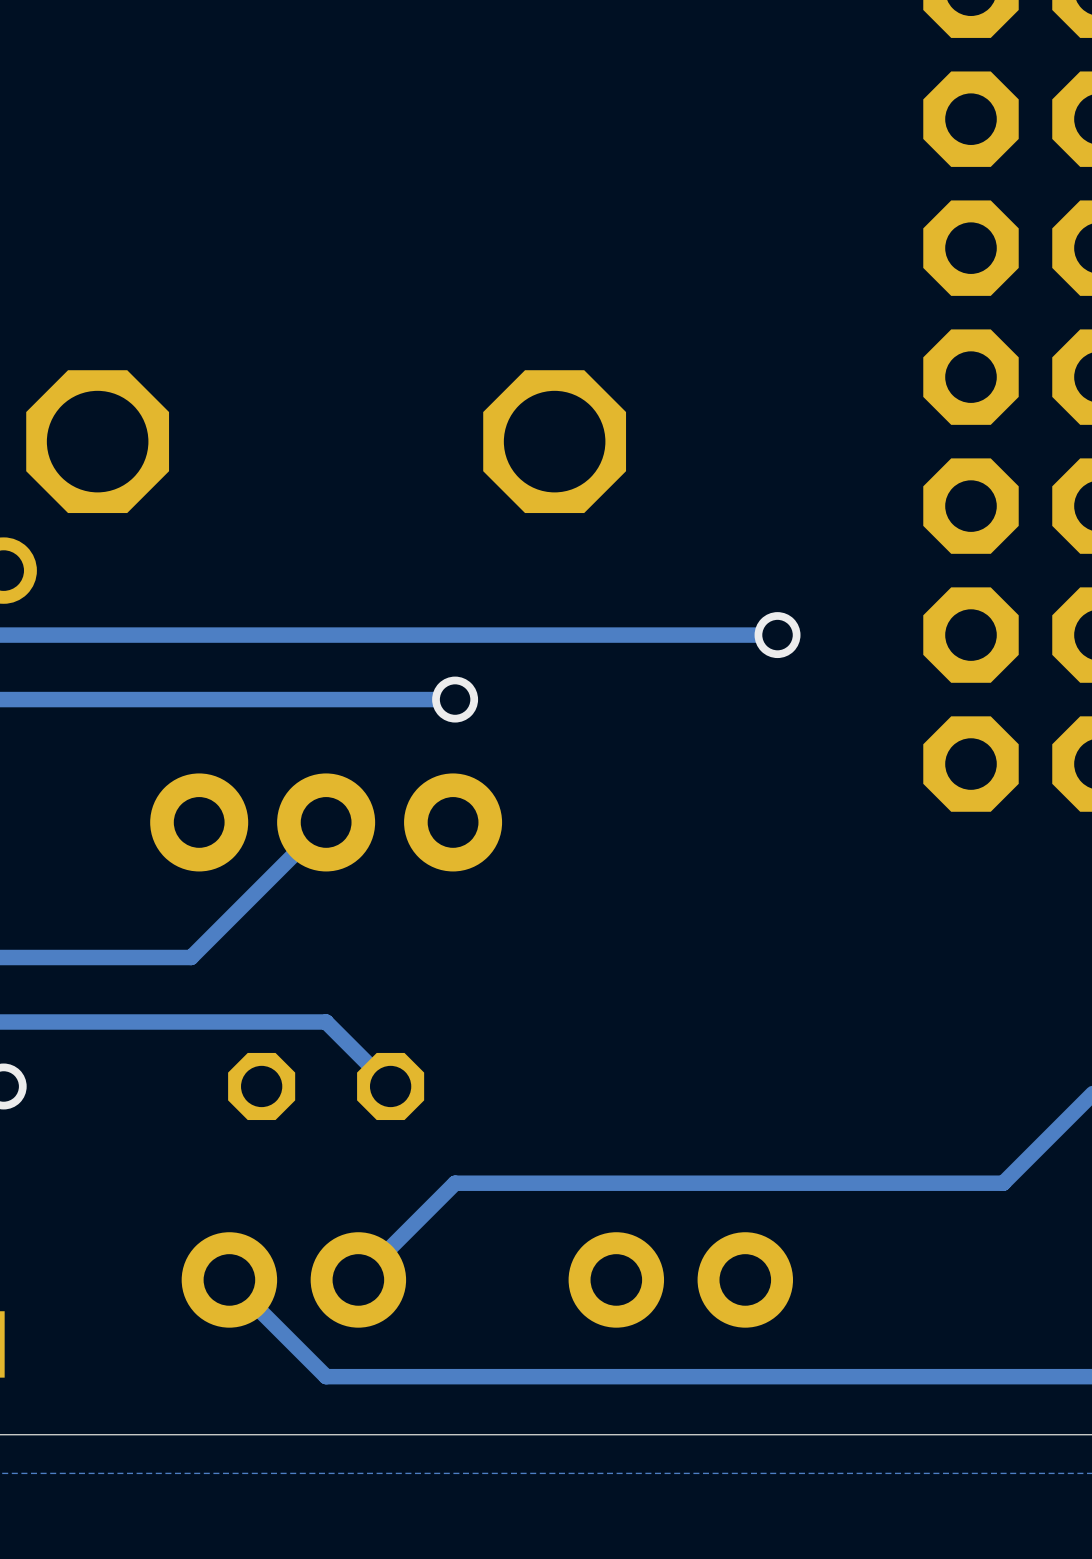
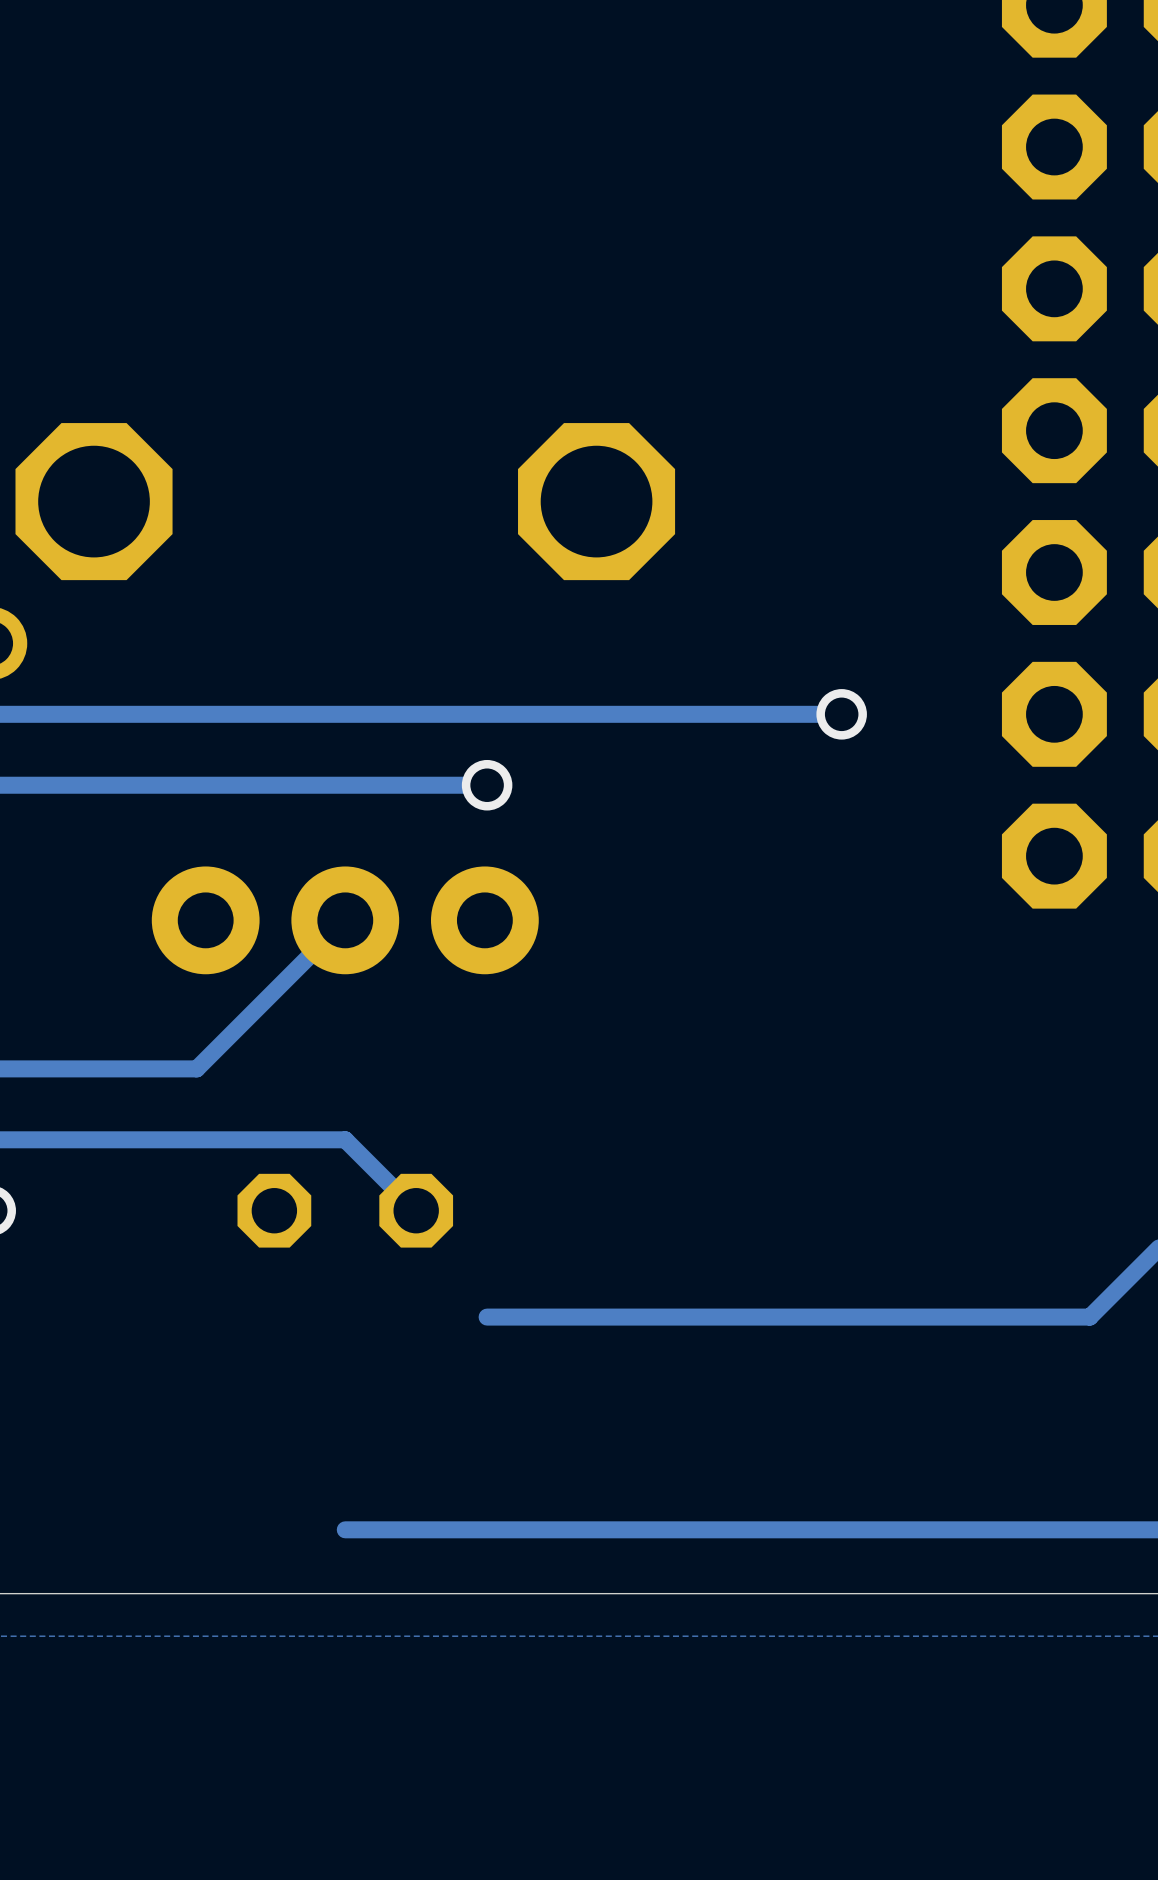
track: (455, 1183) (358, 1279) -> none
track: (229, 1279) (326, 1376) -> none
part: (293, 1279) -> none
part: (680, 1279) -> none

